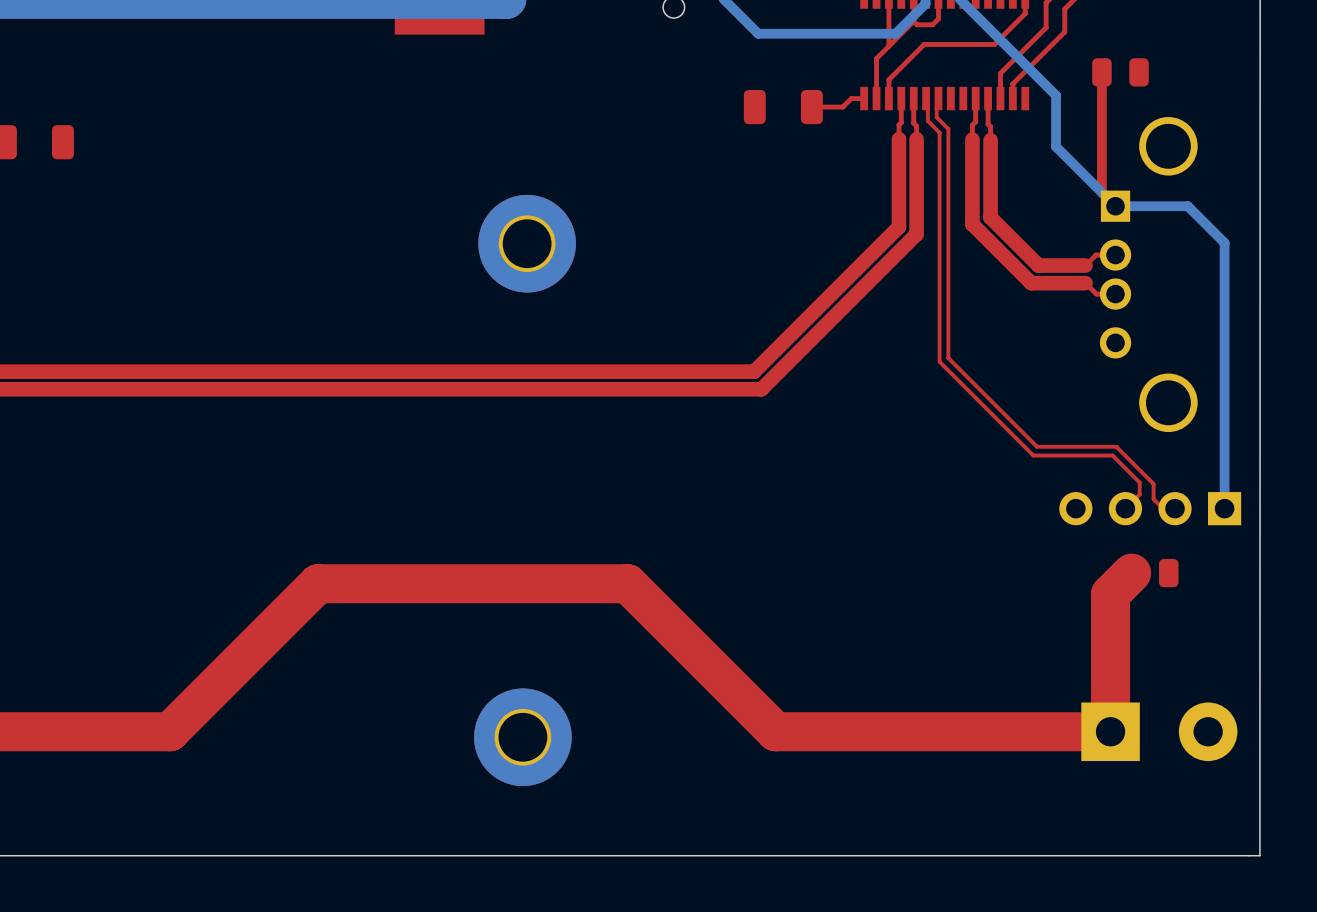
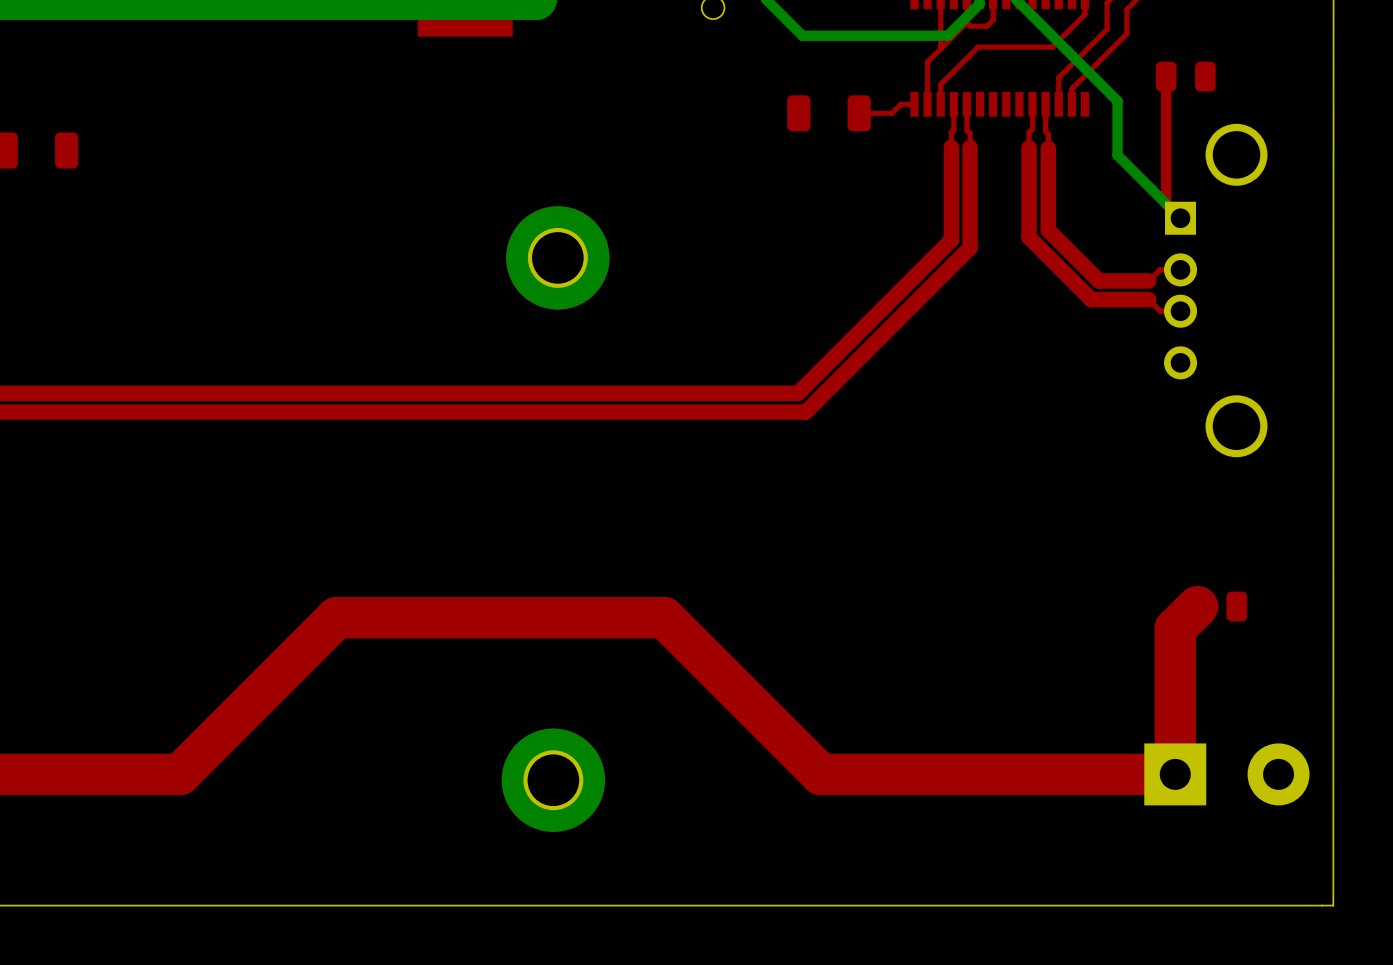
top track: (926, 98) (927, 121) (939, 132) (939, 361) (1033, 455) (1112, 455) (1139, 482) (1139, 494) (1125, 508) -> none
top track: (938, 98) (936, 117) (948, 129) (948, 358) (1037, 446) (1116, 446) (1153, 483) (1153, 499) (1163, 508) (1175, 508) -> none
bottom track: (1115, 206) (1187, 206) (1224, 242) (1224, 508) -> none
part: (1150, 508) -> none

